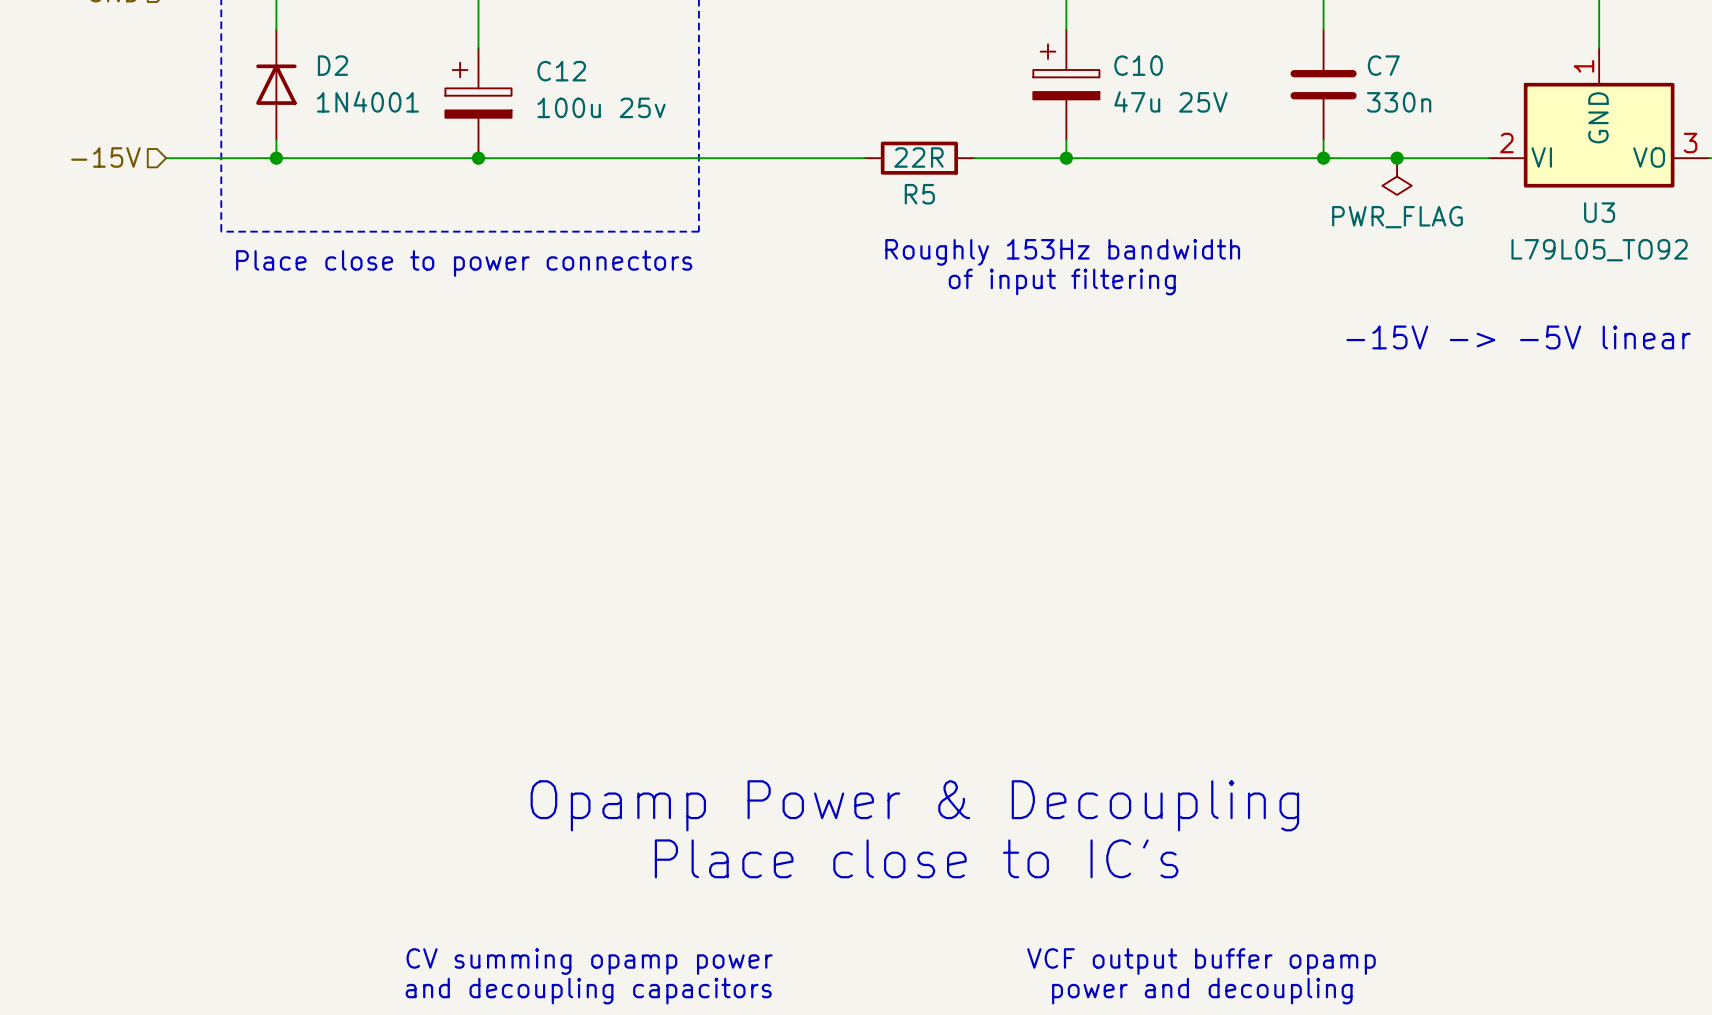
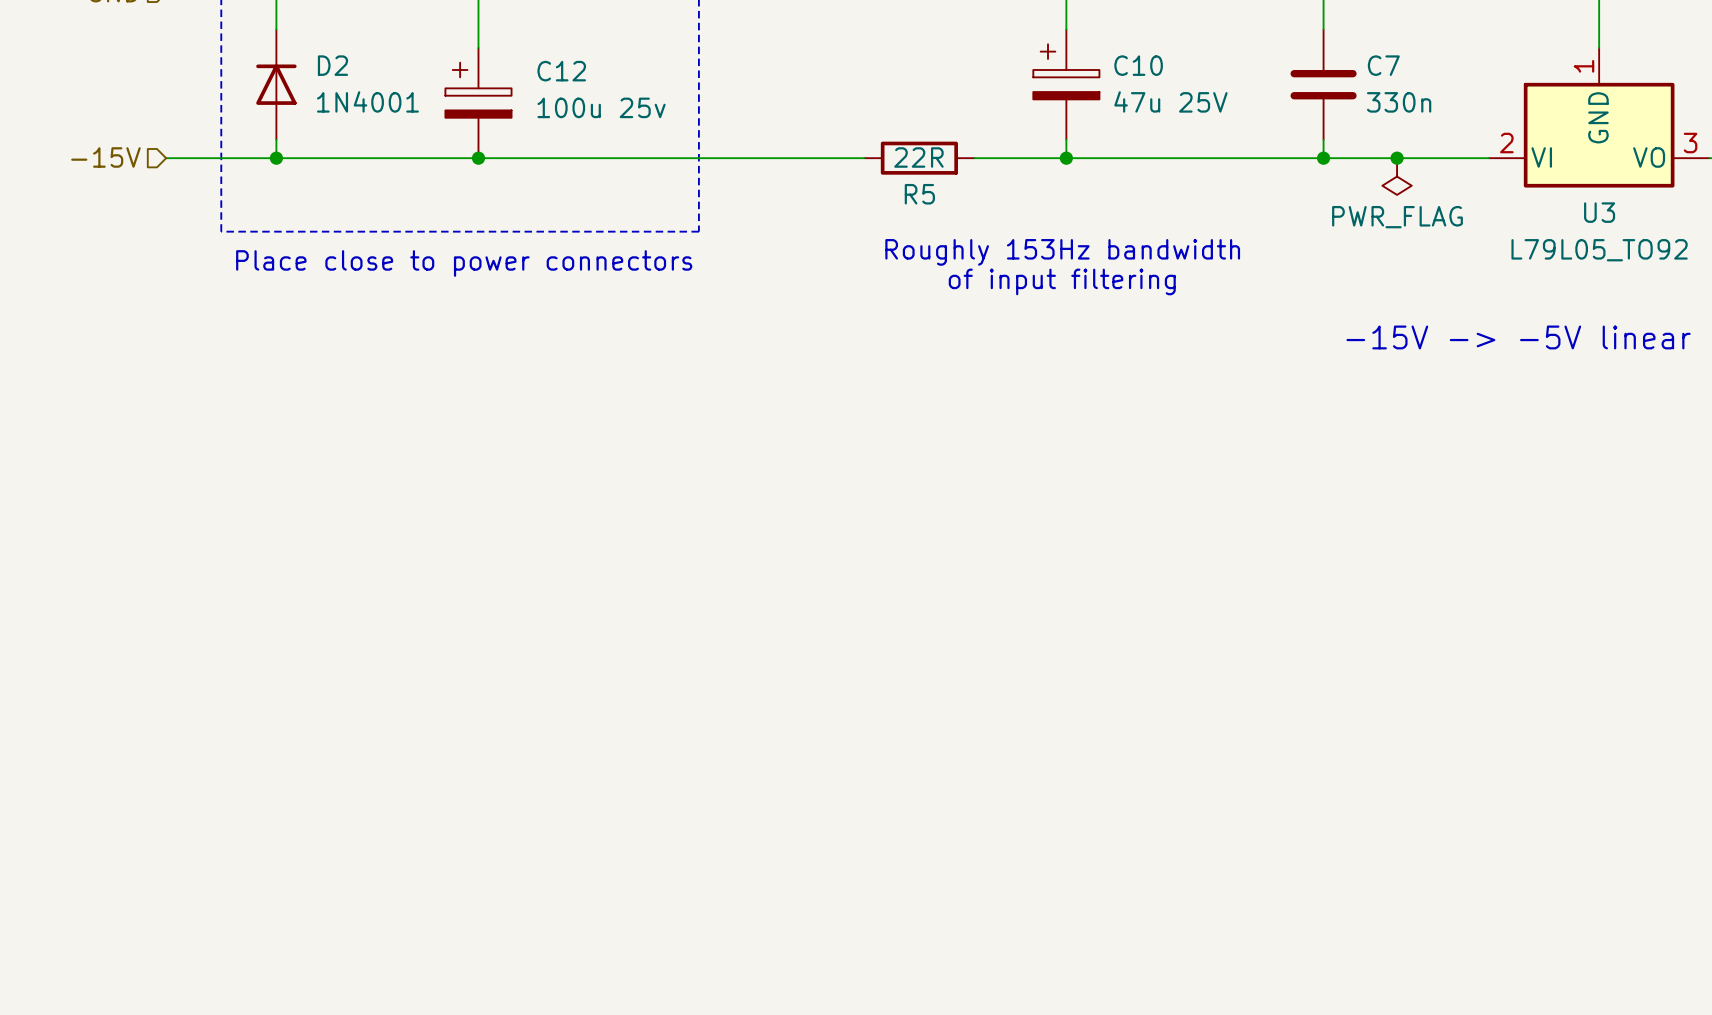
text: Opamp Power & Decoupling (914, 805) -> none
text: Place close to IC's (916, 858) -> none
text: CV summing opamp power (589, 961) -> none
text: VCF output buffer opamp (1201, 961) -> none
text: and decoupling capacitors (588, 991) -> none
text: power and decoupling (1202, 991) -> none

